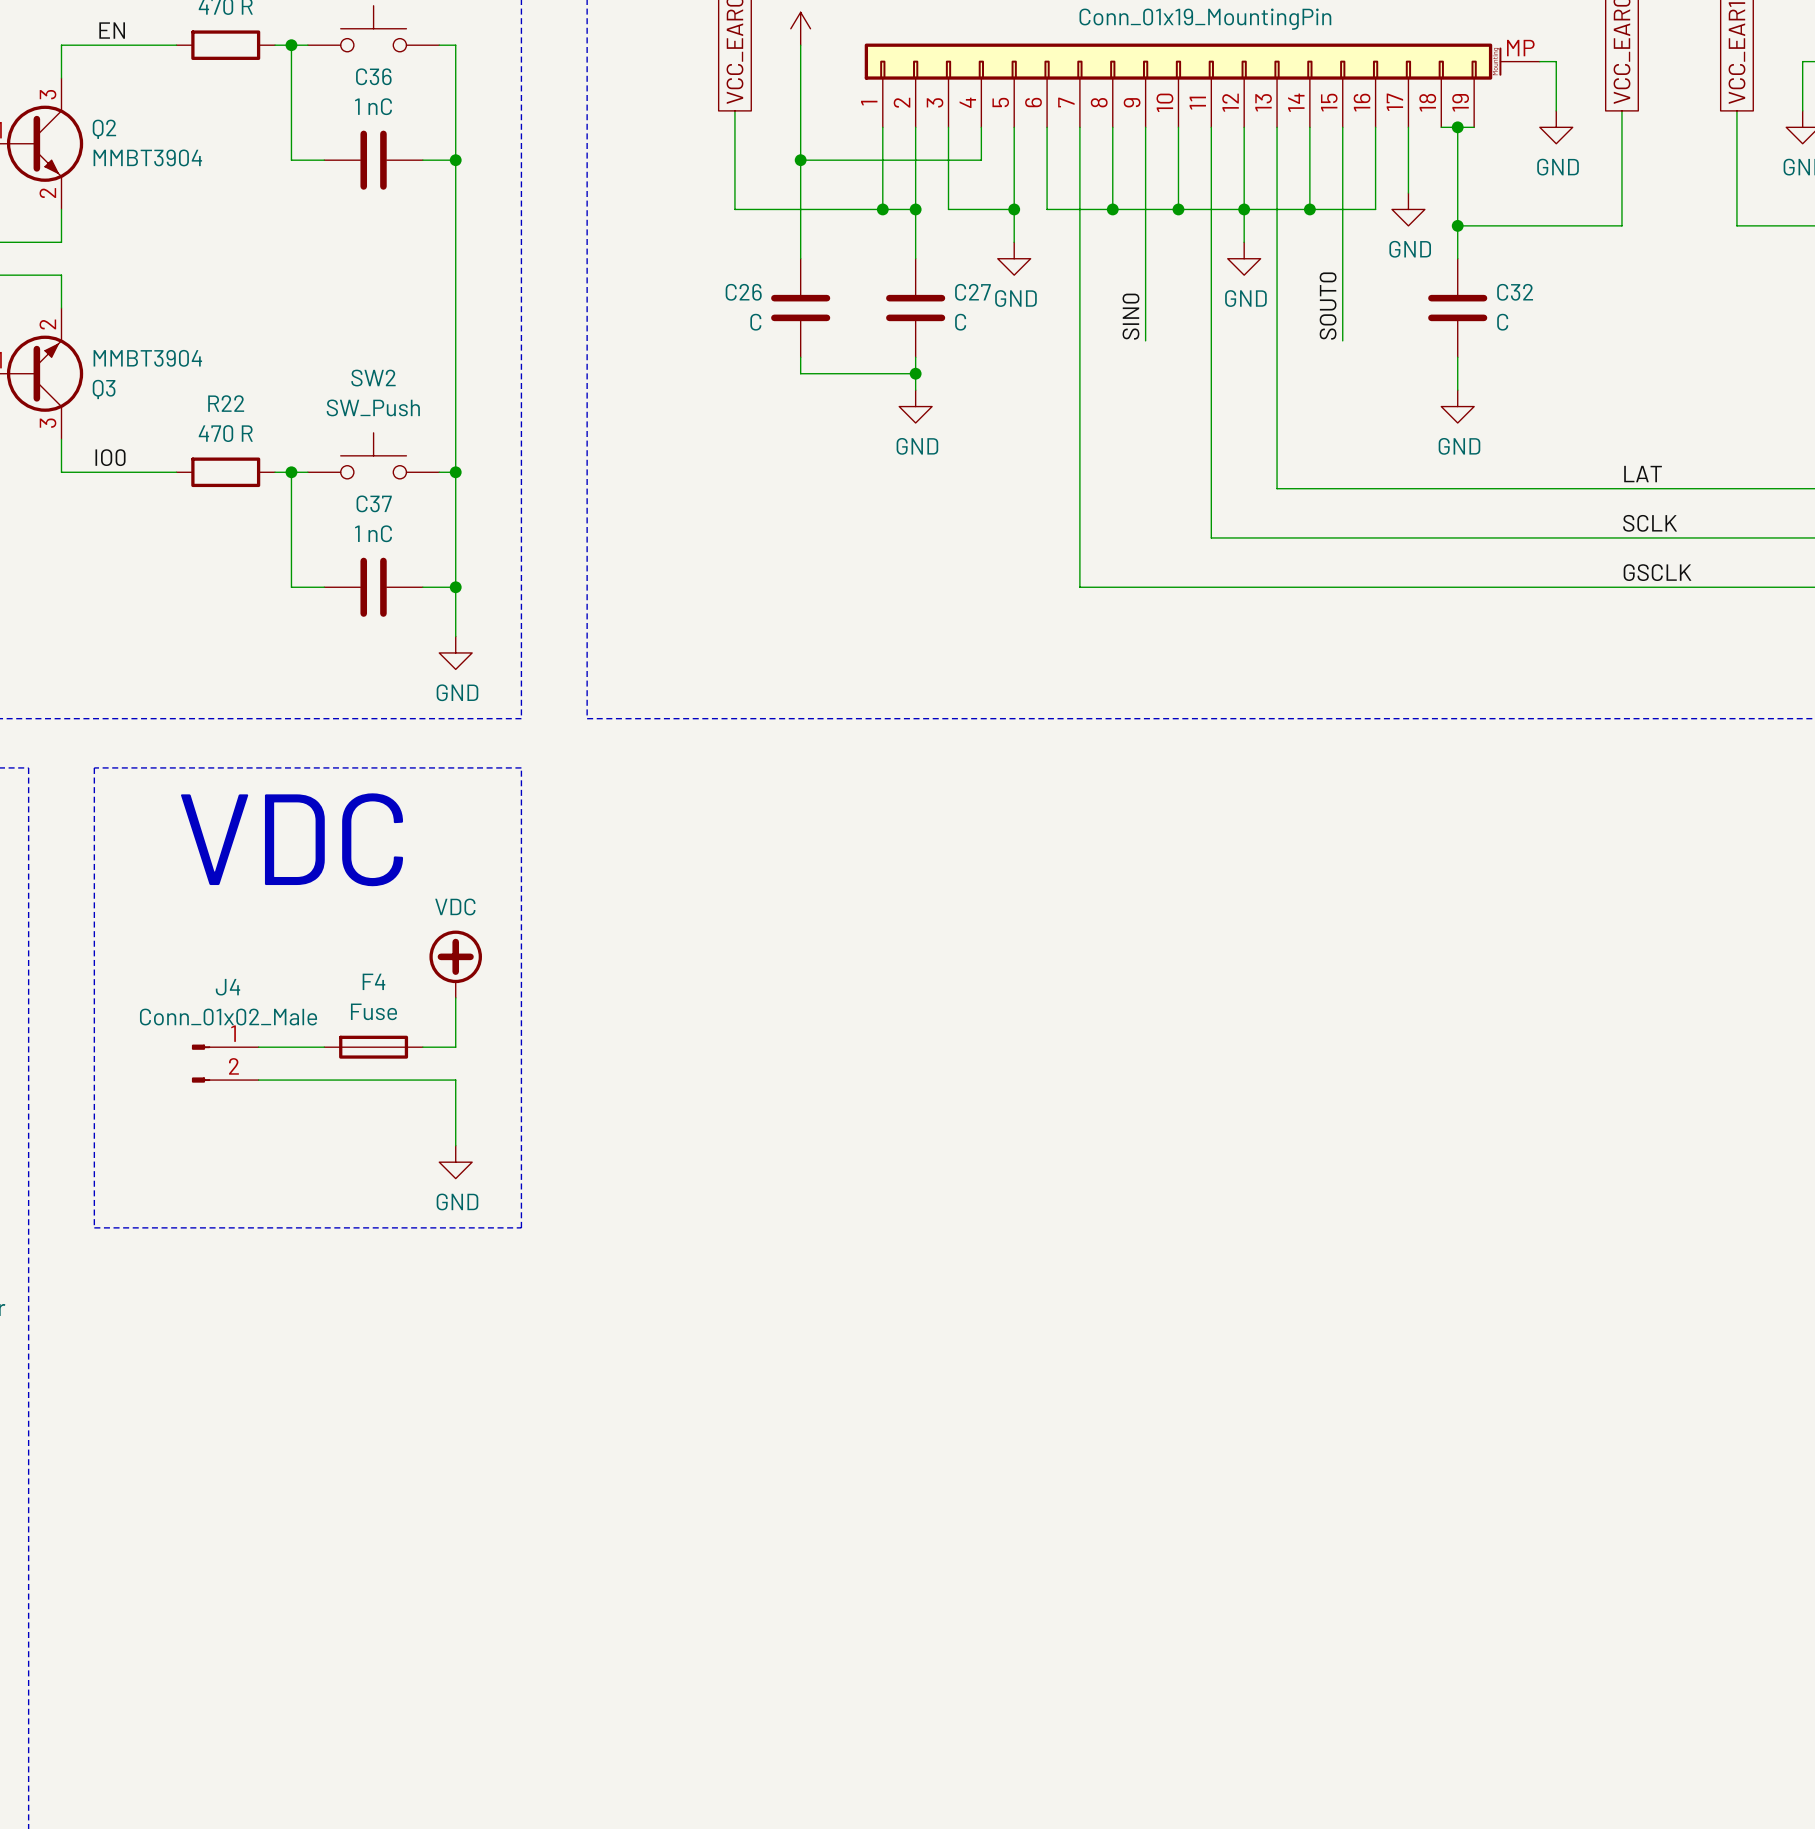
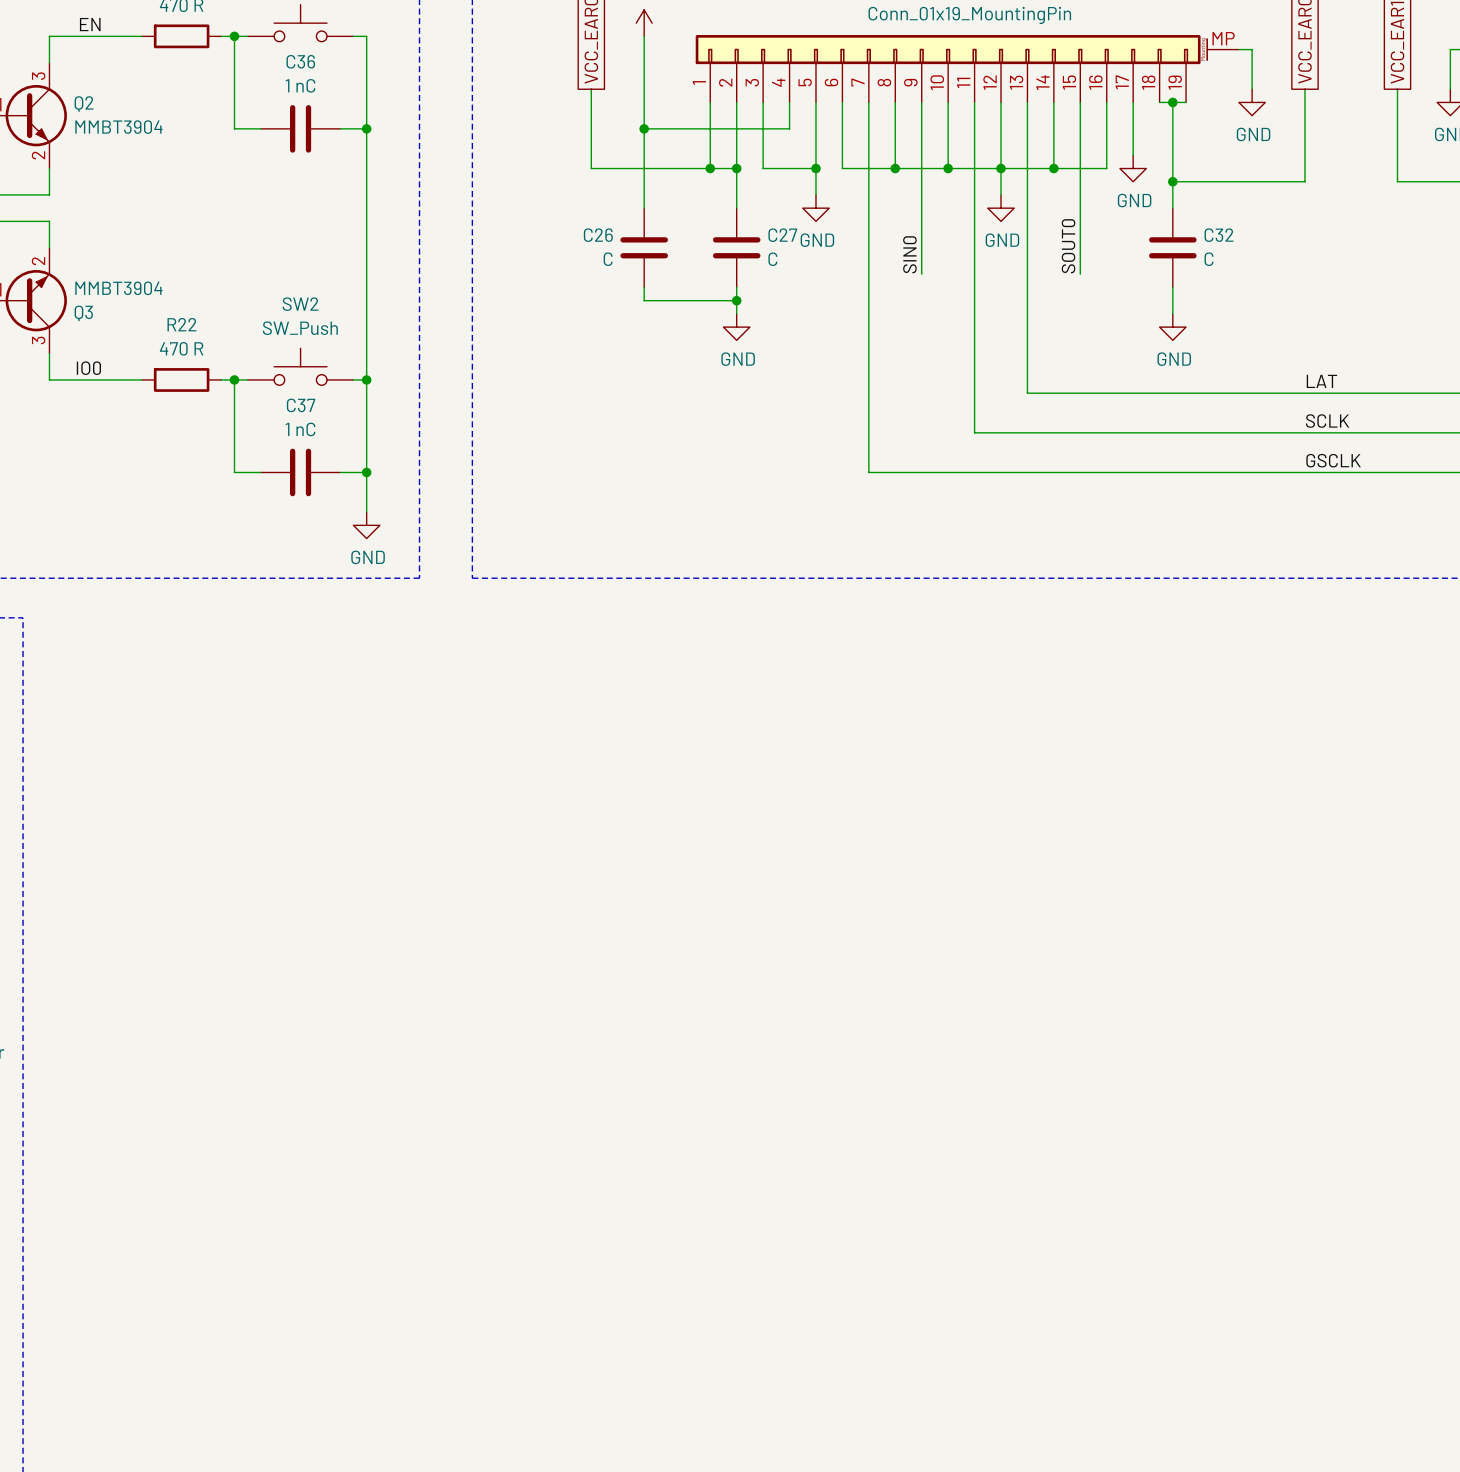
line: (94, 767) (94, 1227) (521, 1227) (521, 767) (94, 767) -> none
text: VDC (292, 839) -> none
power symbol: VDC (455, 964) -> none
wire: (455, 997) (455, 1047) (422, 1047) -> none
wire: (258, 1047) (324, 1047) -> none
F4: Fuse (373, 1047) -> none
J4: Conn_01x02_Male (225, 1063) -> none
wire: (258, 1080) (455, 1080) (455, 1145) -> none
power symbol: GND (455, 1162) -> none

